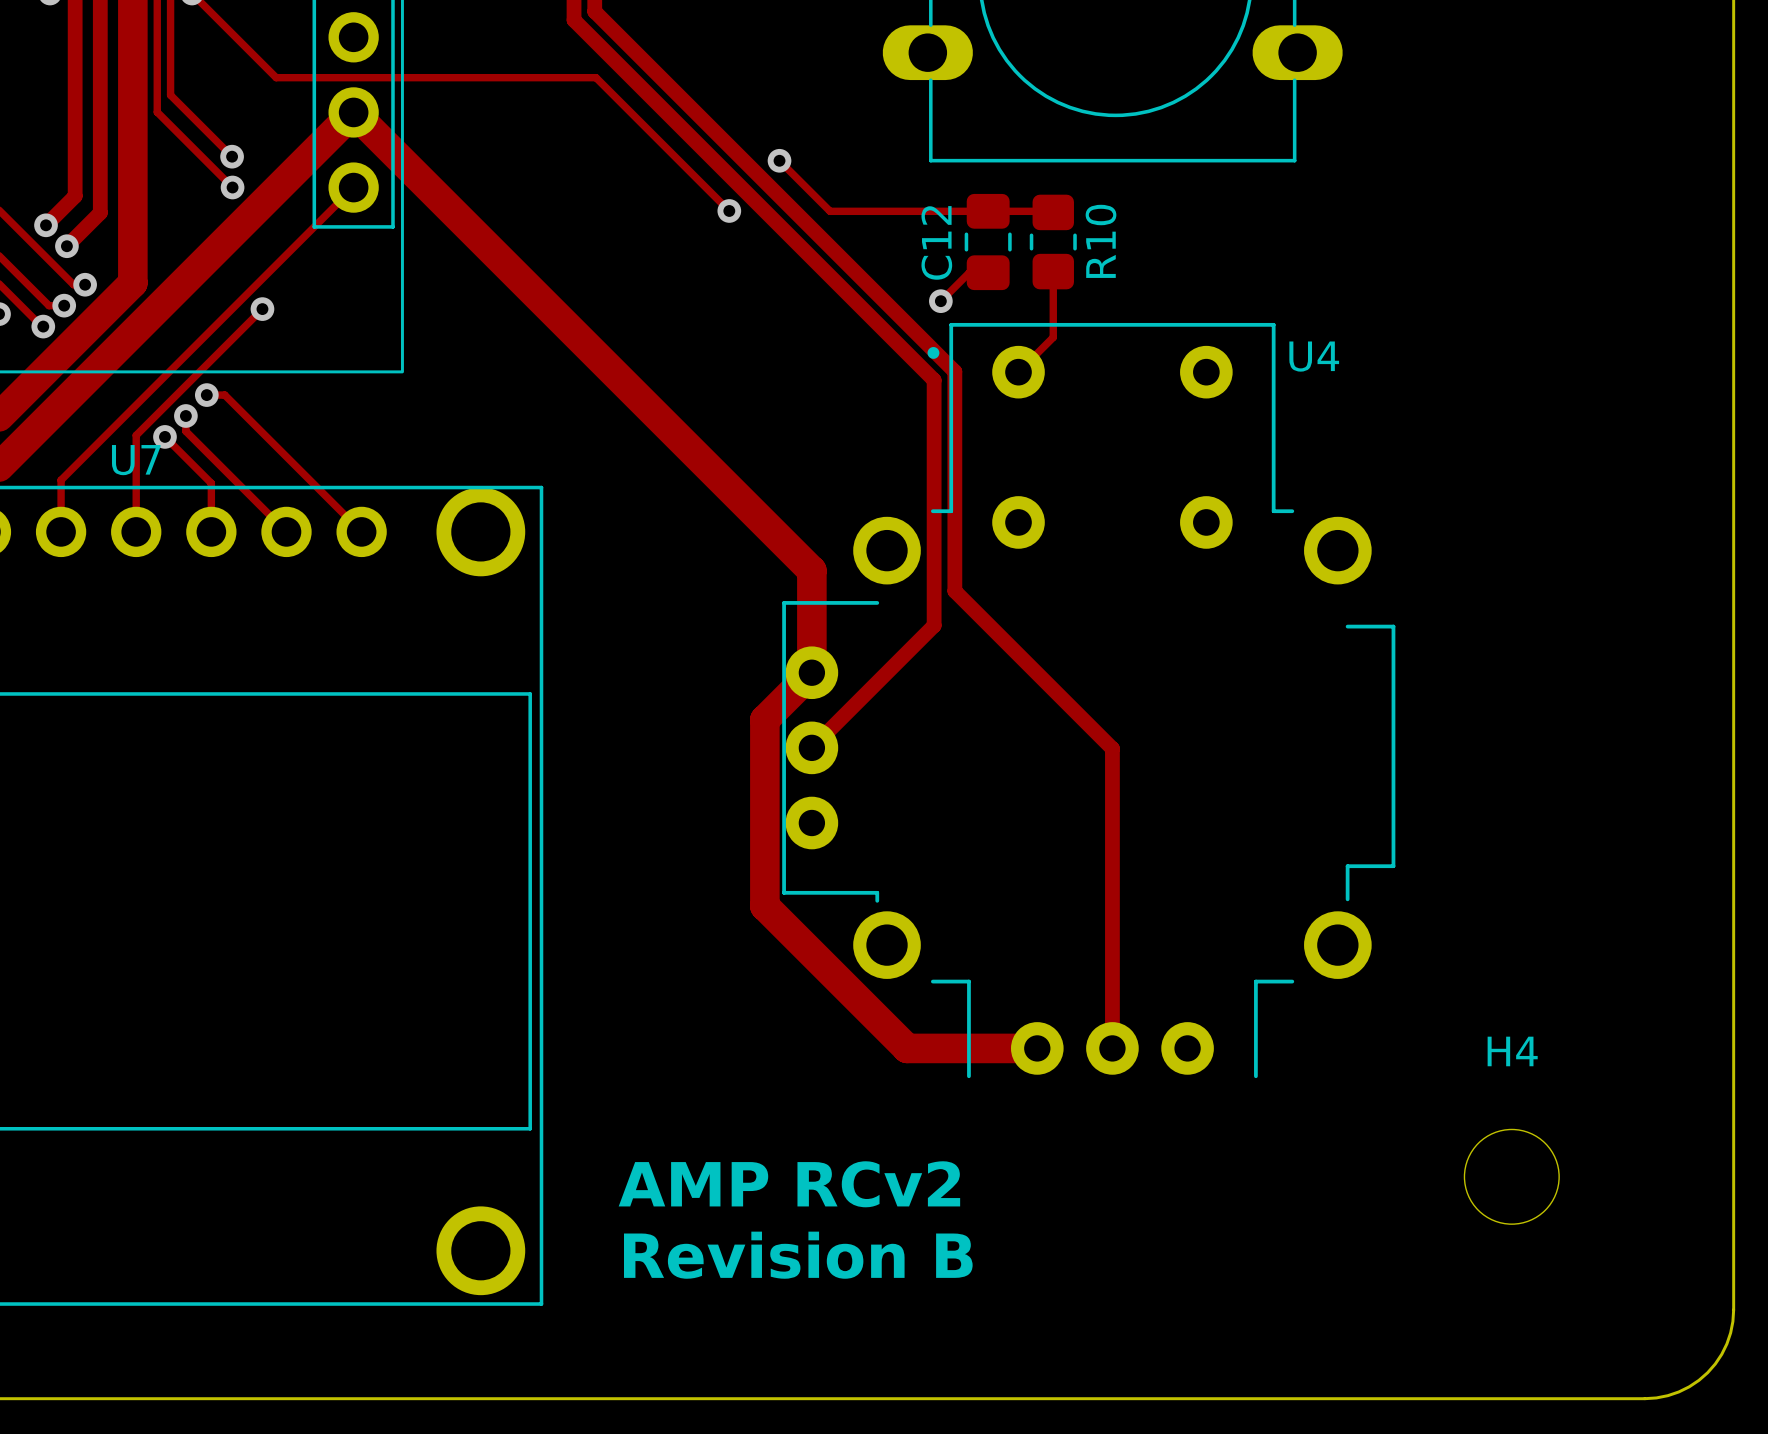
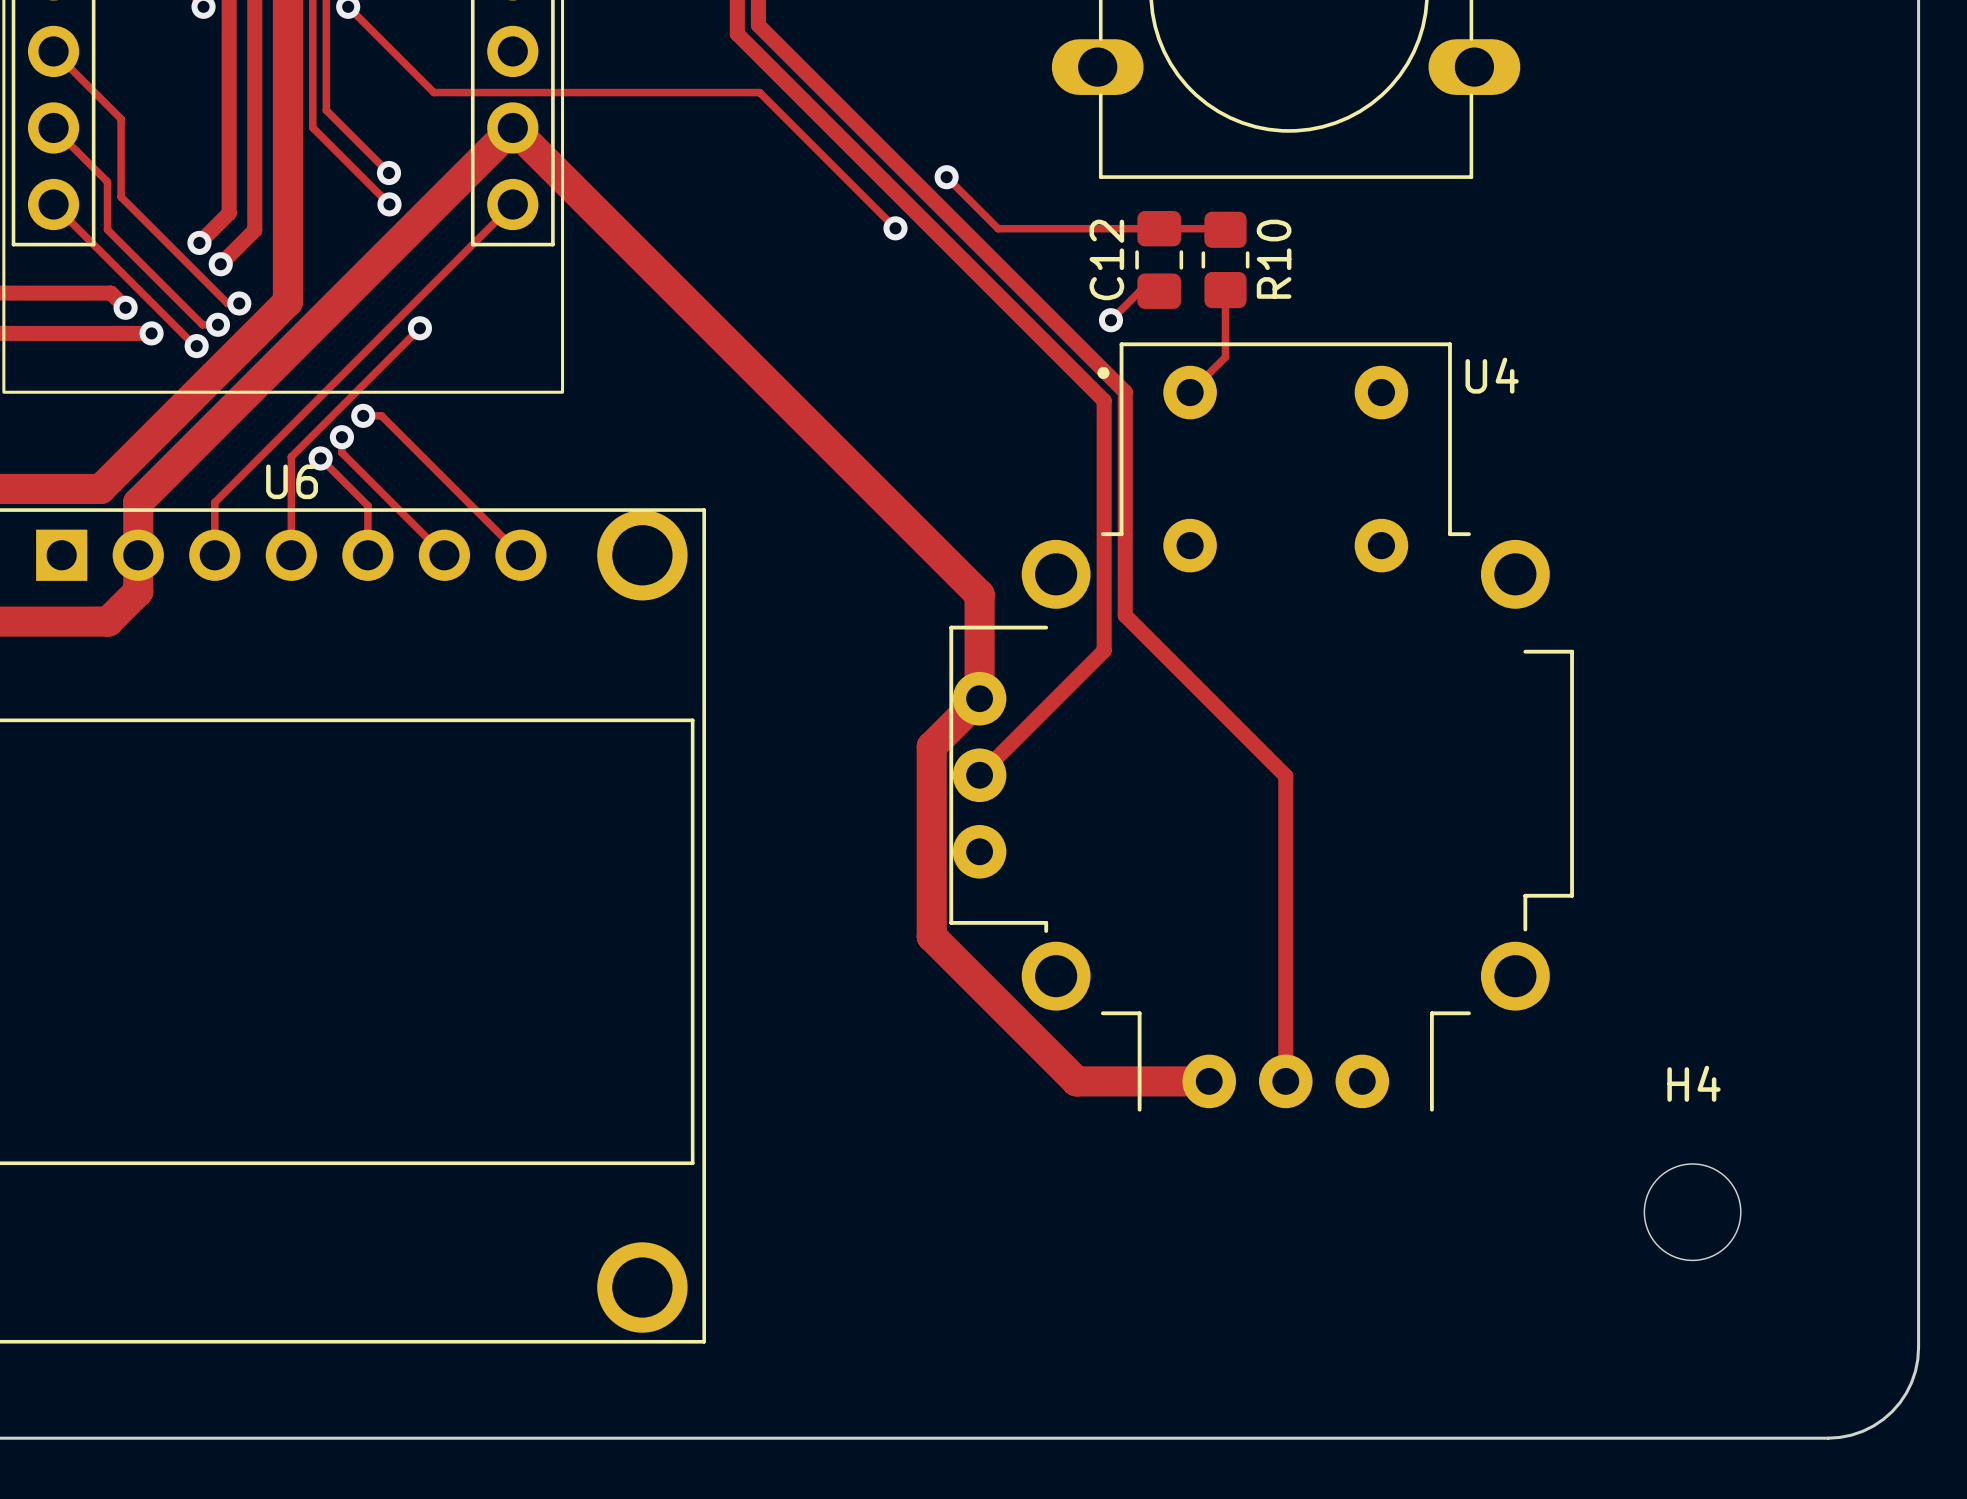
U7 name: U7 (136, 460) -> U6 (292, 481)
text: AMP RCv2 (789, 1184) -> none
text: Revision B (798, 1255) -> none

